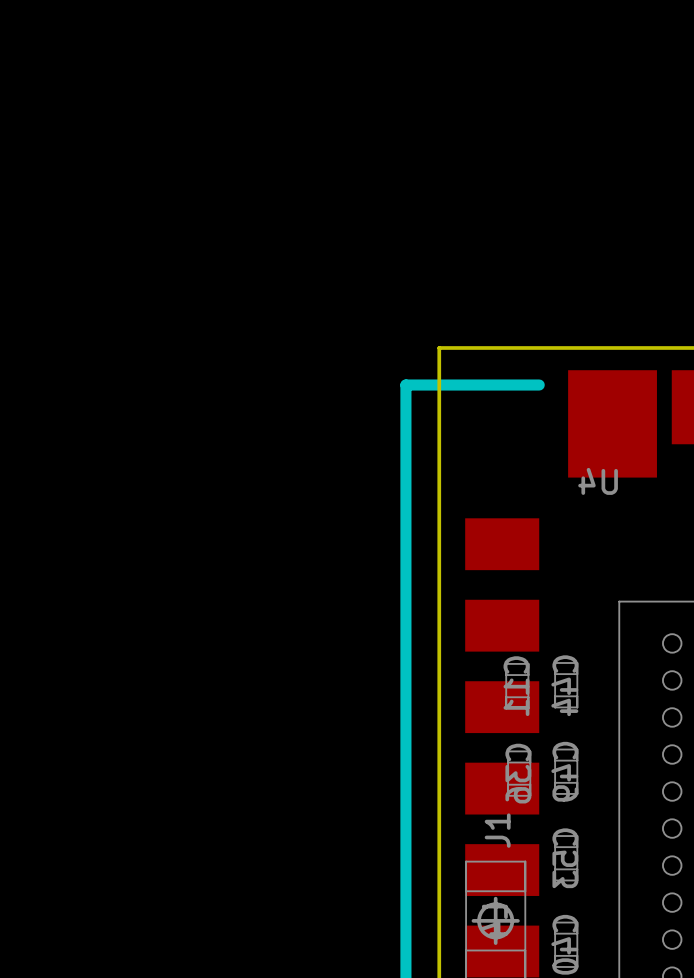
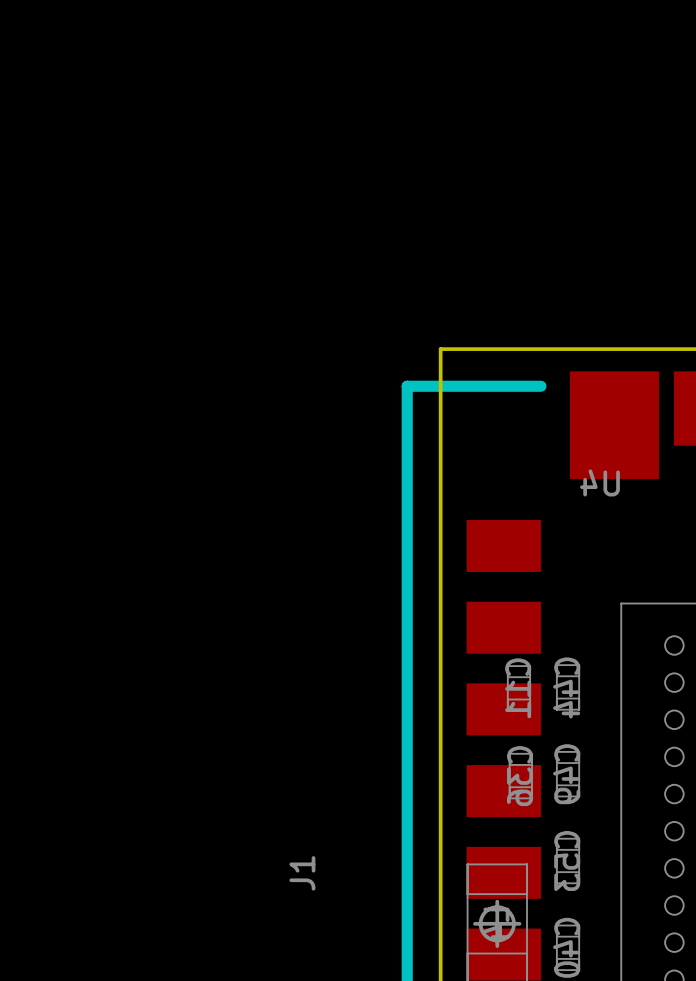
J1 name position: J1 (497, 830) -> J1 (302, 873)

